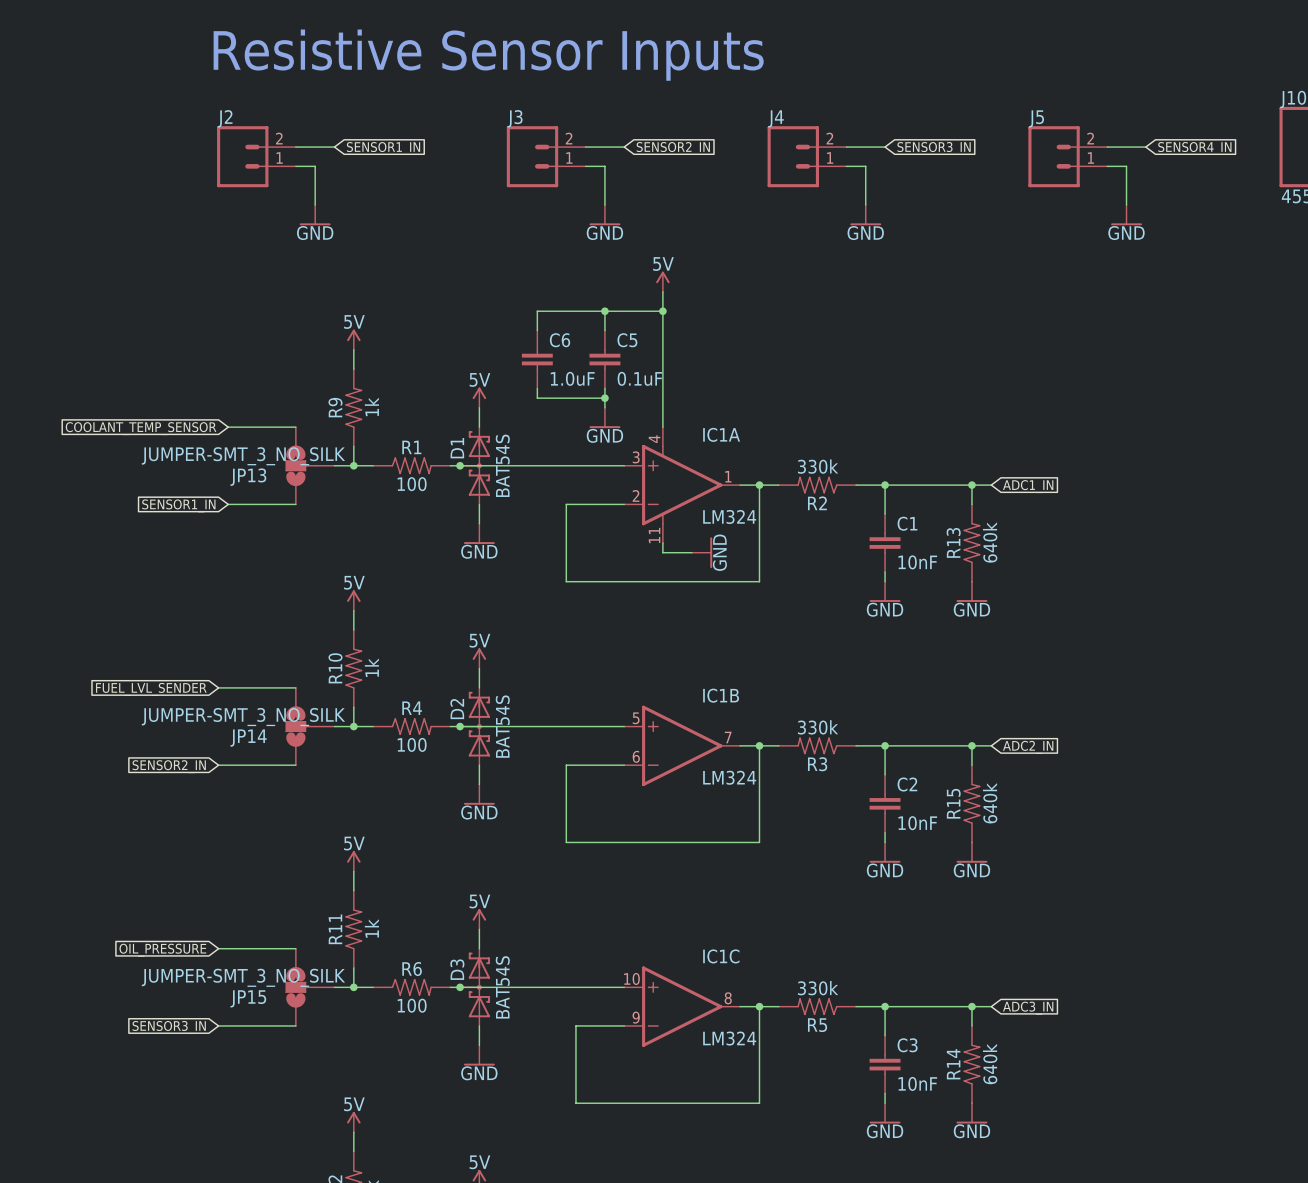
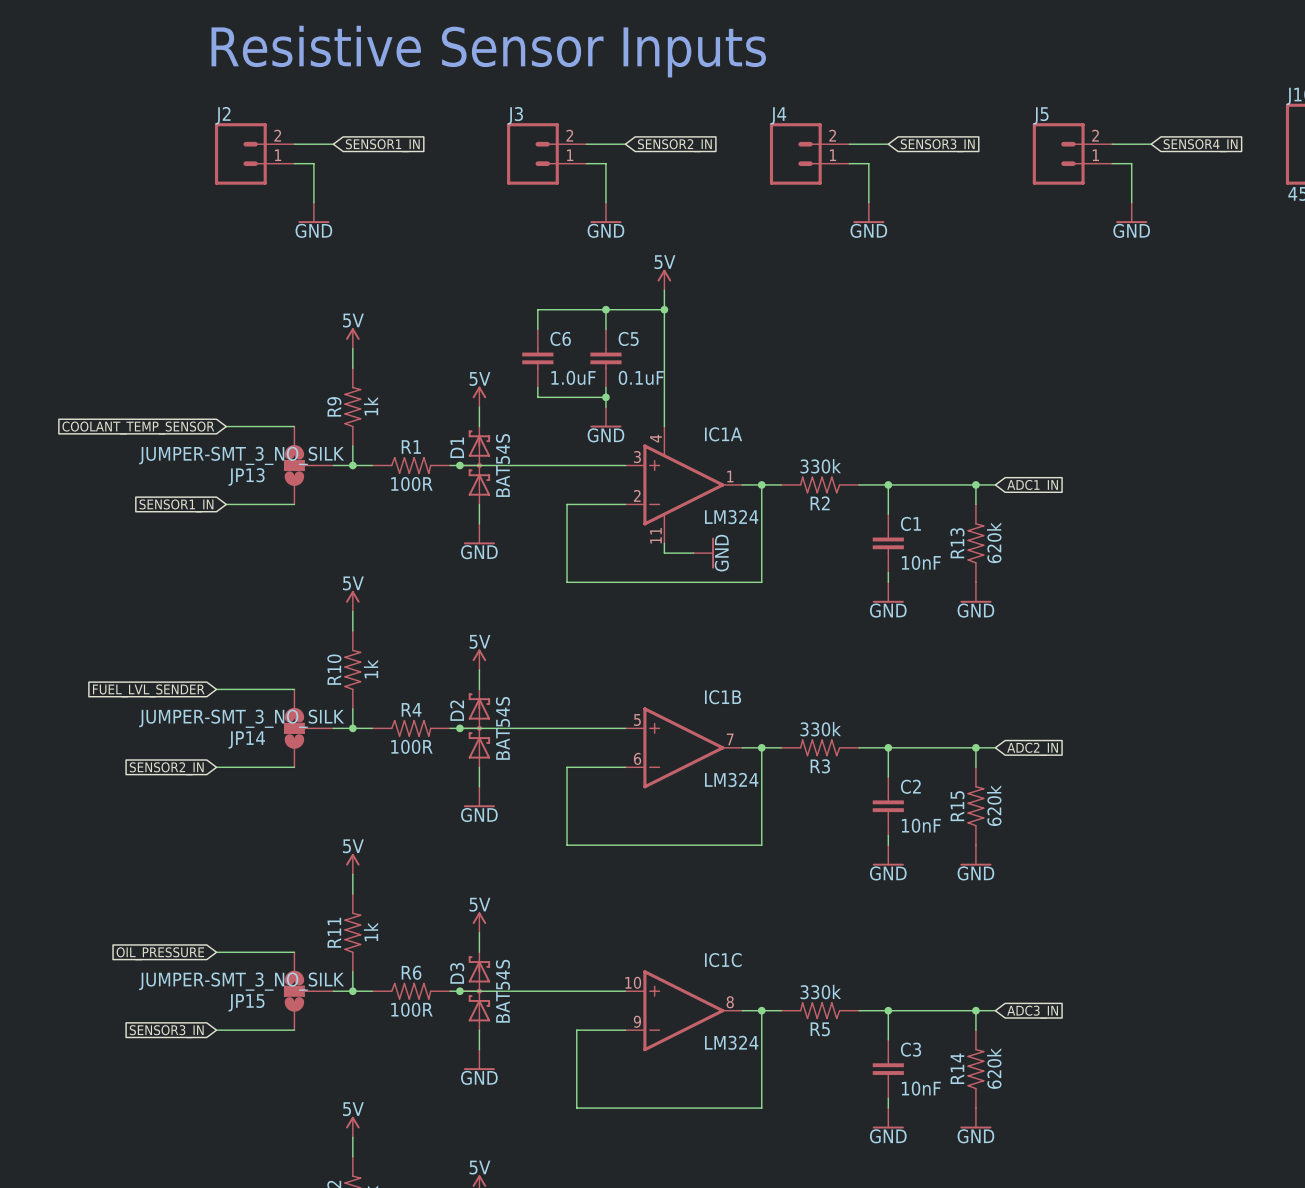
R1 value: 100 (412, 484) -> 100R (411, 484)
R13 value: 640k (990, 542) -> 620k (994, 542)
R4 value: 100 (412, 744) -> 100R (411, 746)
R15 value: 640k (990, 803) -> 620k (994, 805)
R6 value: 100 (412, 1005) -> 100R (411, 1009)
R14 value: 640k (990, 1064) -> 620k (994, 1068)

